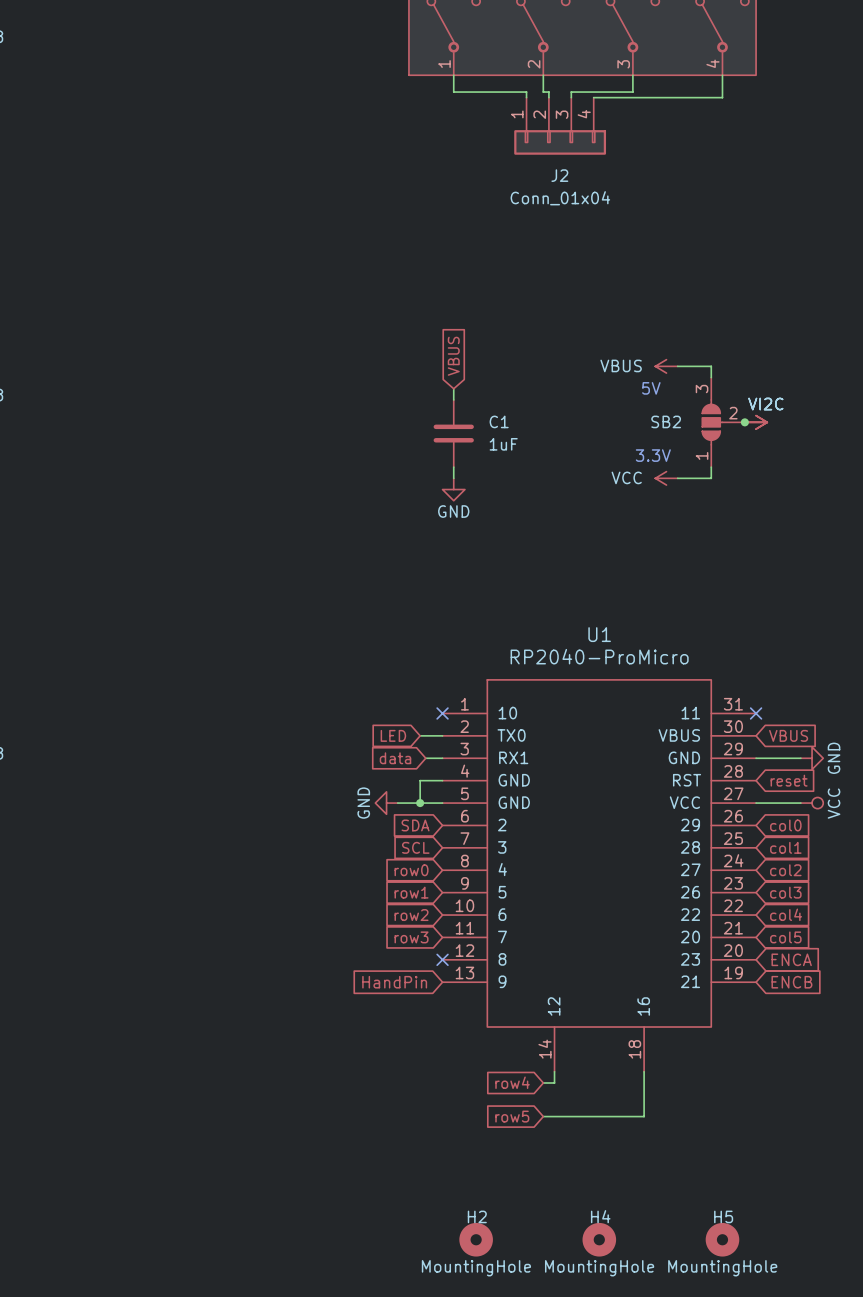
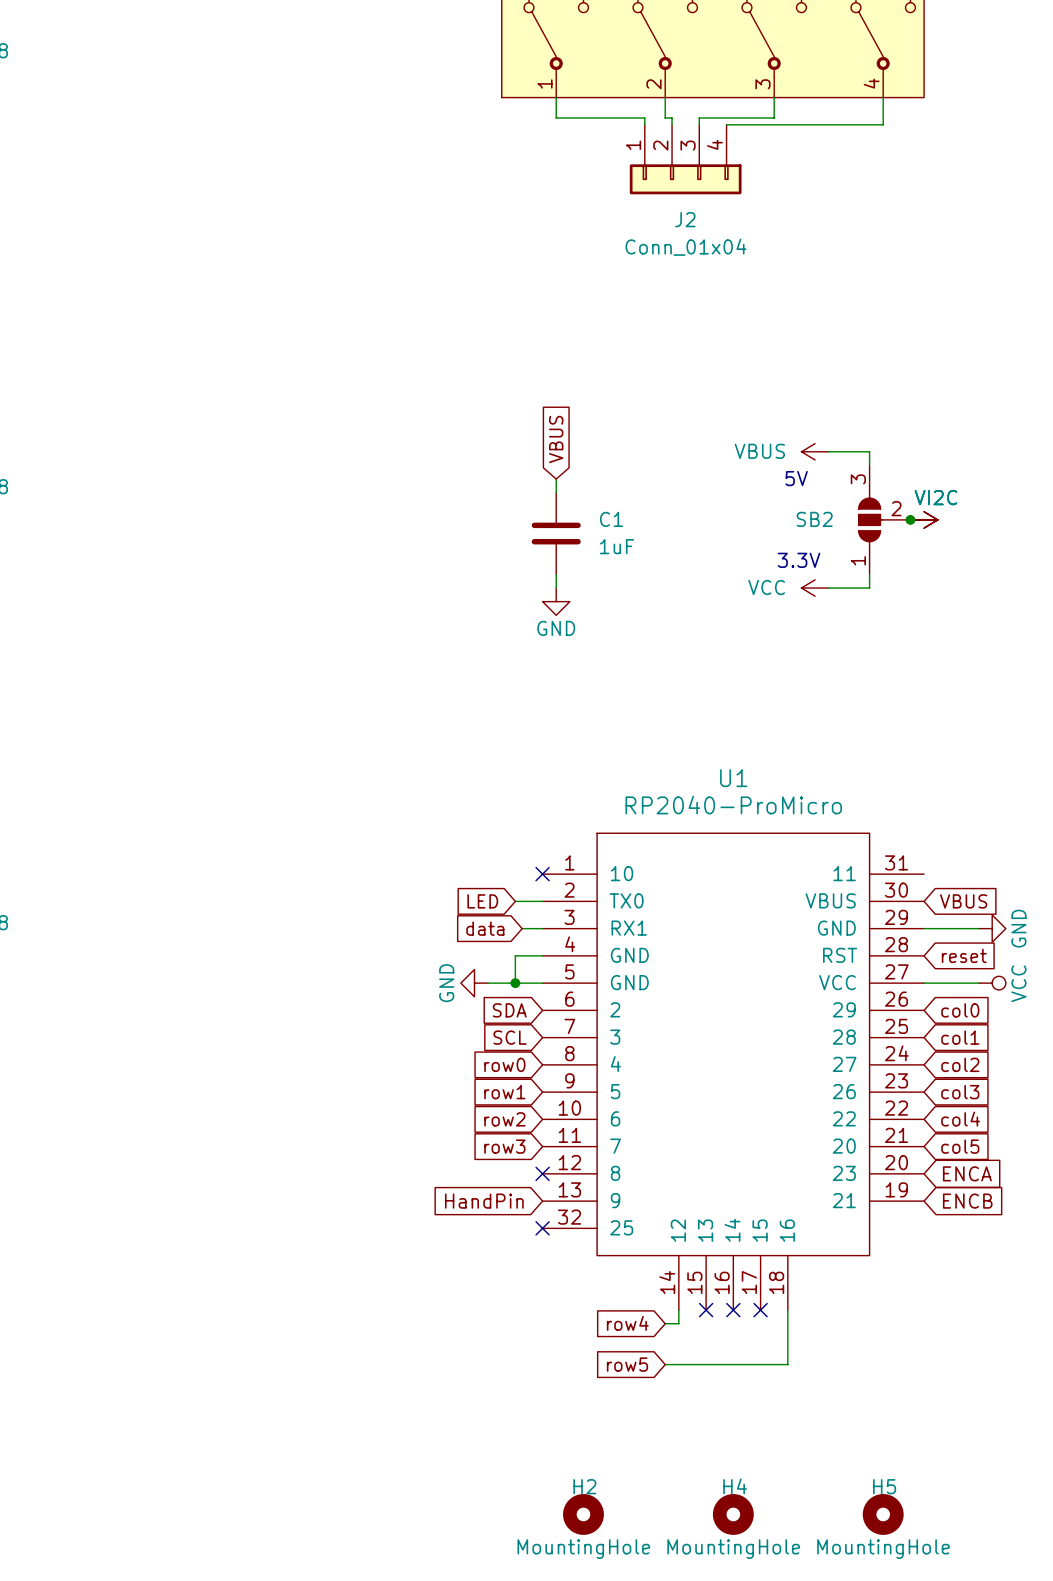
U1 symbol: [442, 679, 757, 1072] -> [542, 833, 925, 1311]
no-connect mark: (756, 713) -> none
no-connect mark: none -> (542, 1228)
no-connect mark: none -> (706, 1310)
no-connect mark: none -> (733, 1310)
no-connect mark: none -> (760, 1310)

